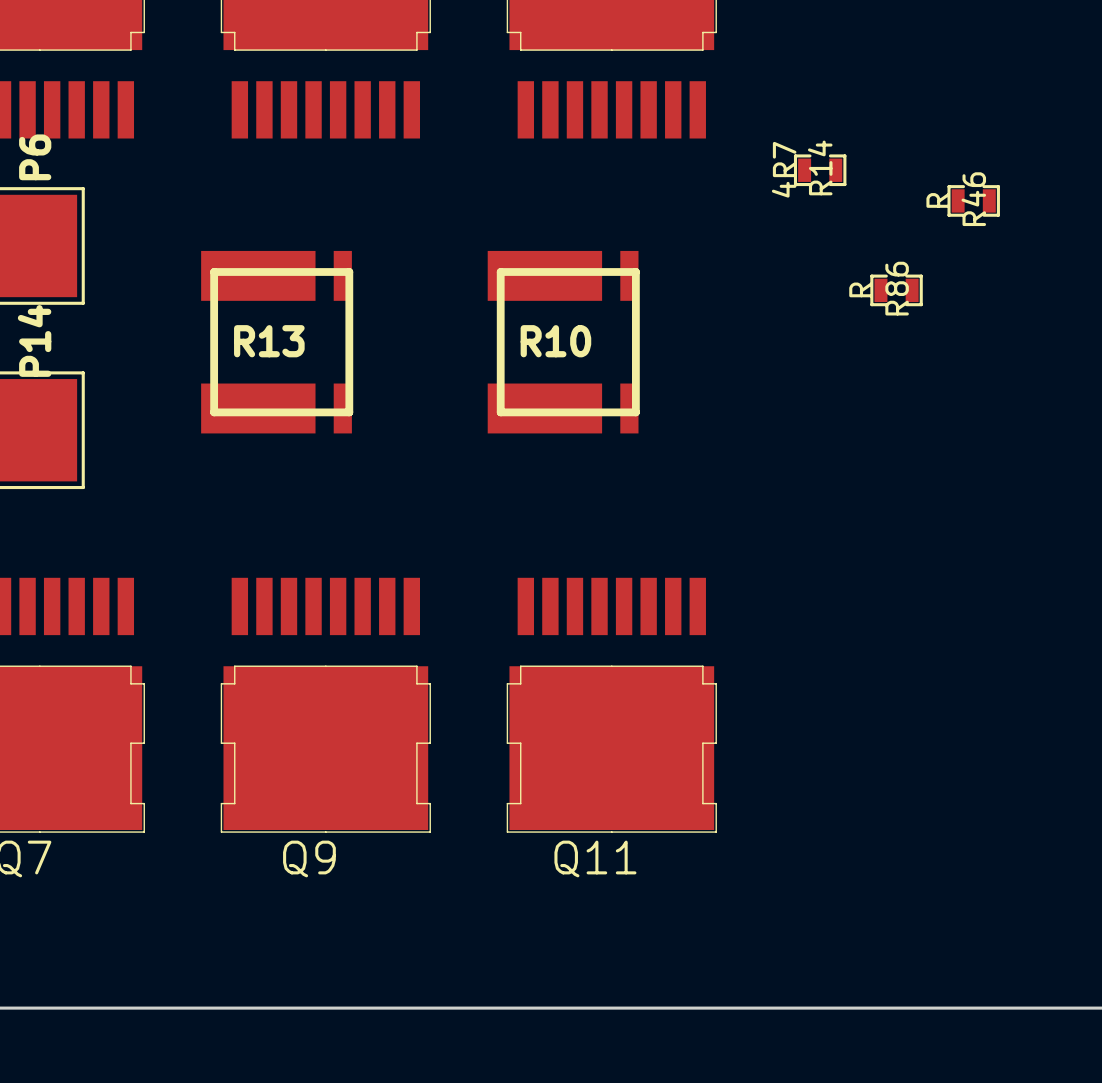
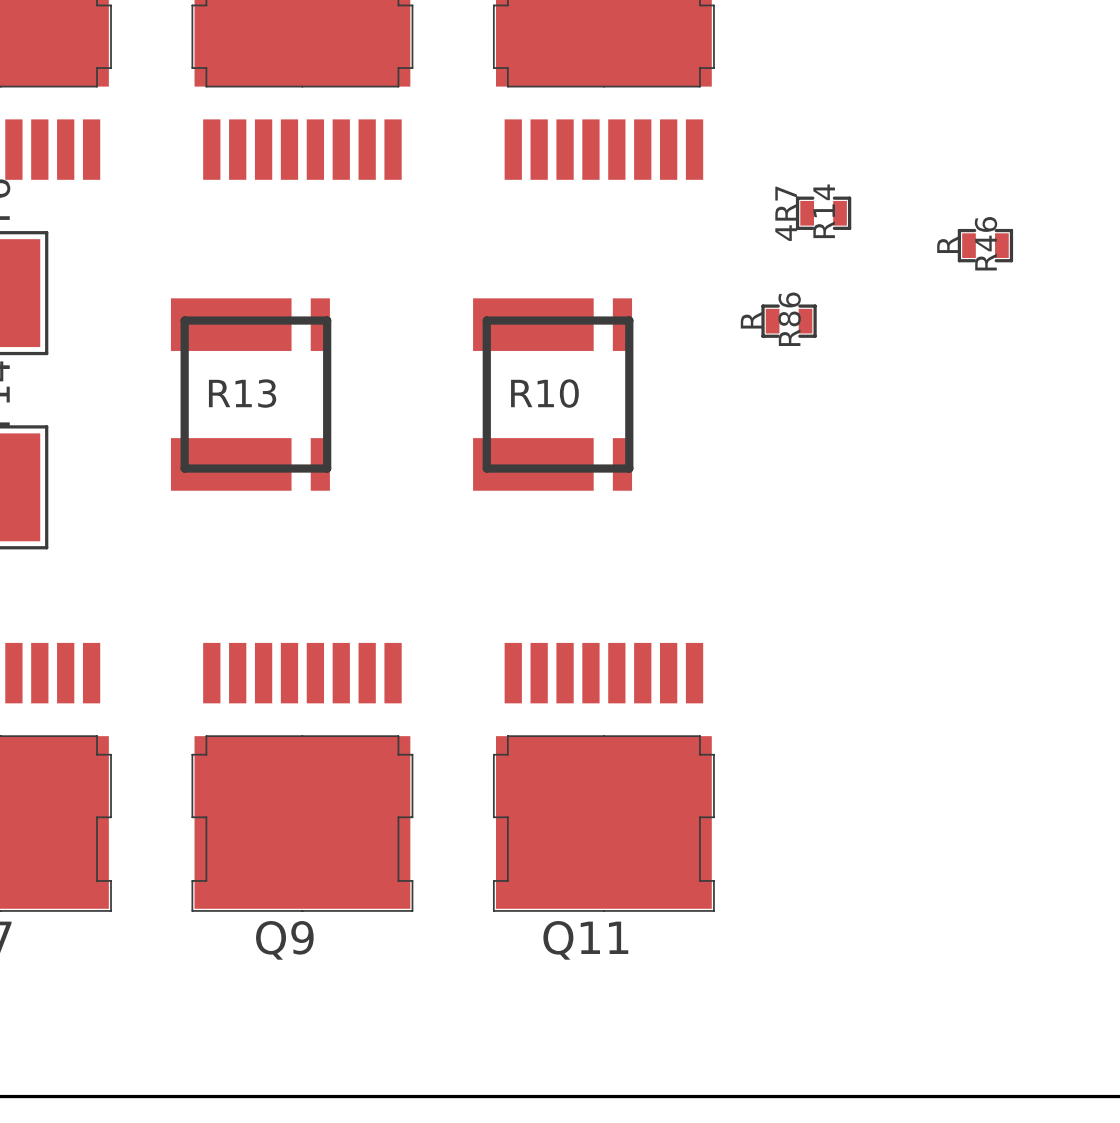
R86 position: (896, 290) -> (789, 321)

